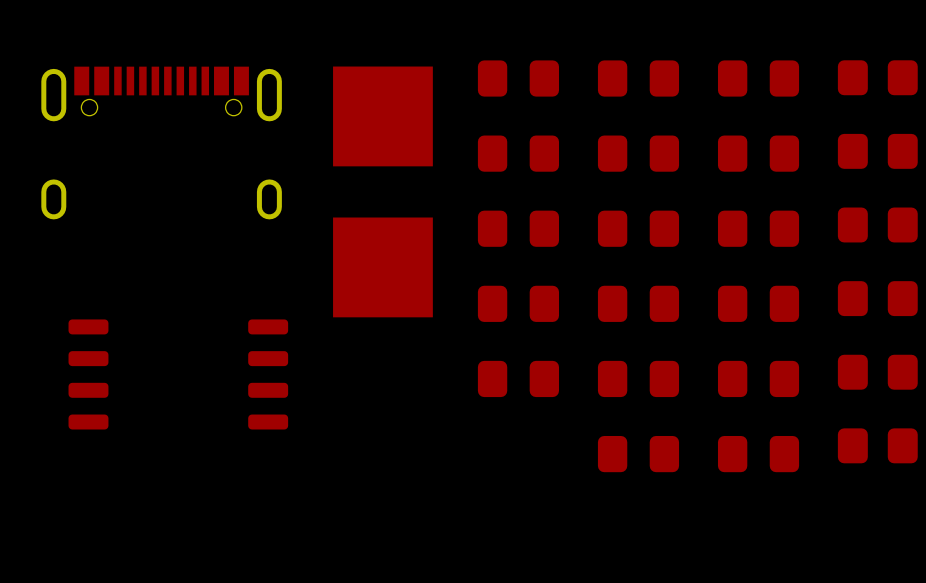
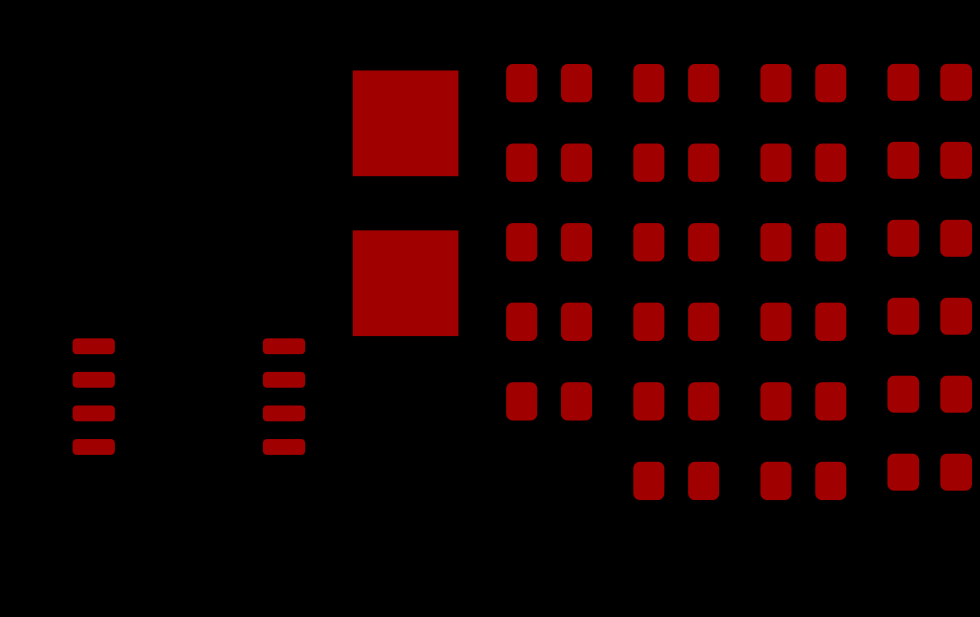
part: (161, 143) -> none

